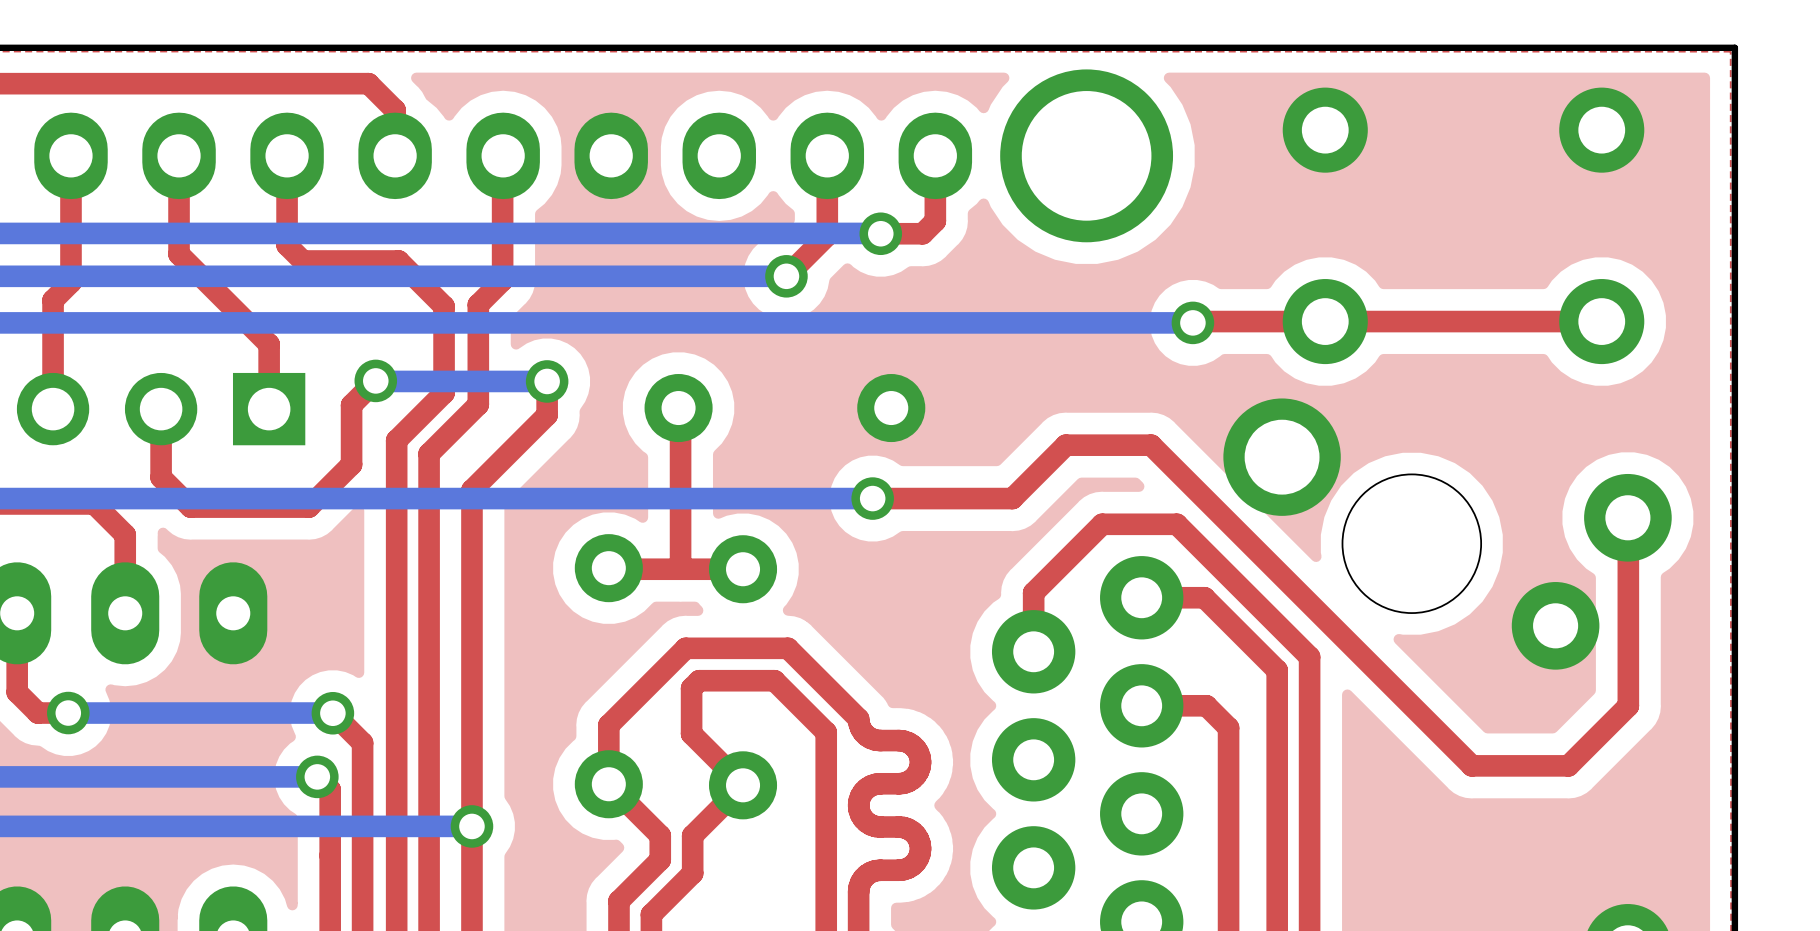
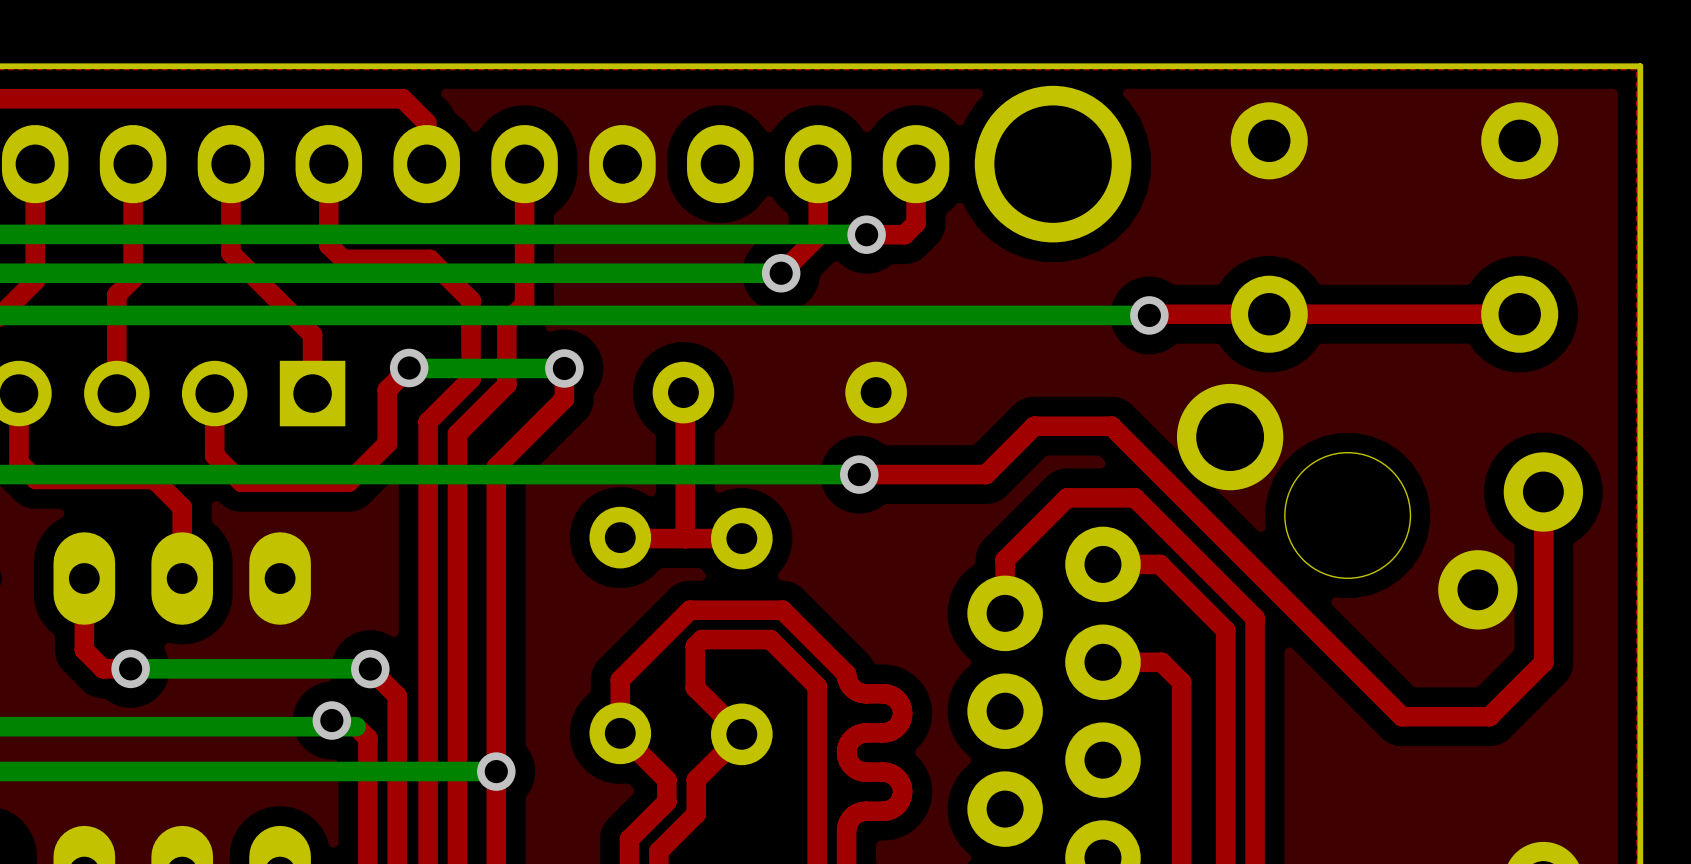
top track: (502, 156) (502, 280) (478, 304) (478, 404) -> (524, 164) (524, 304) (506, 322) (506, 384) (502, 389)
via position: (317, 776) -> (331, 720)

